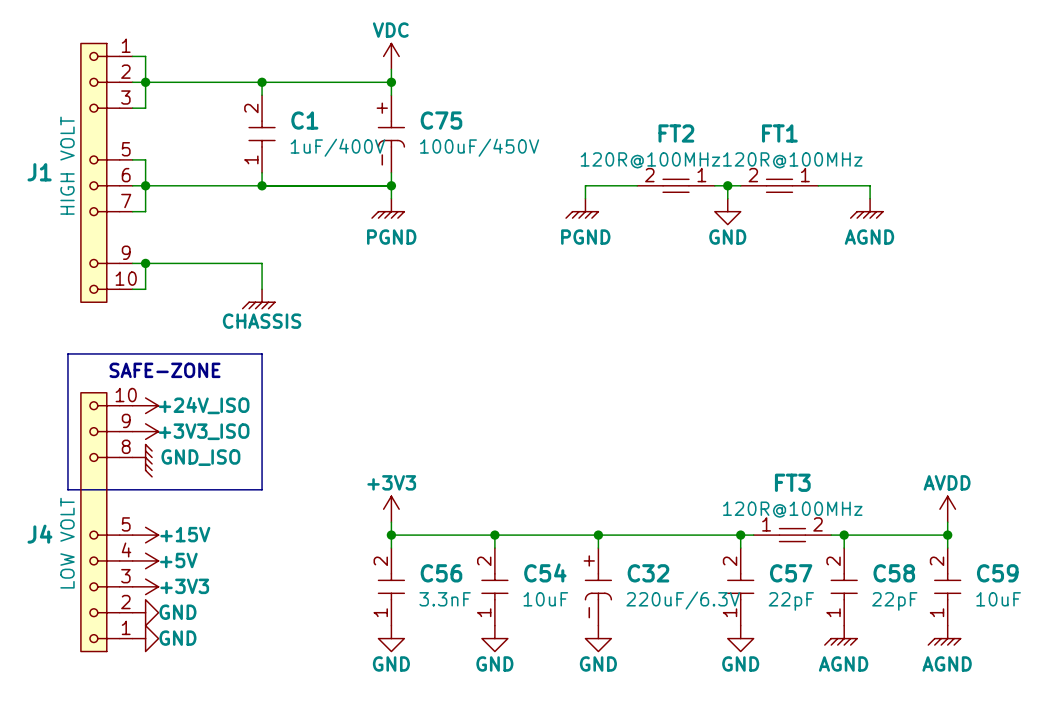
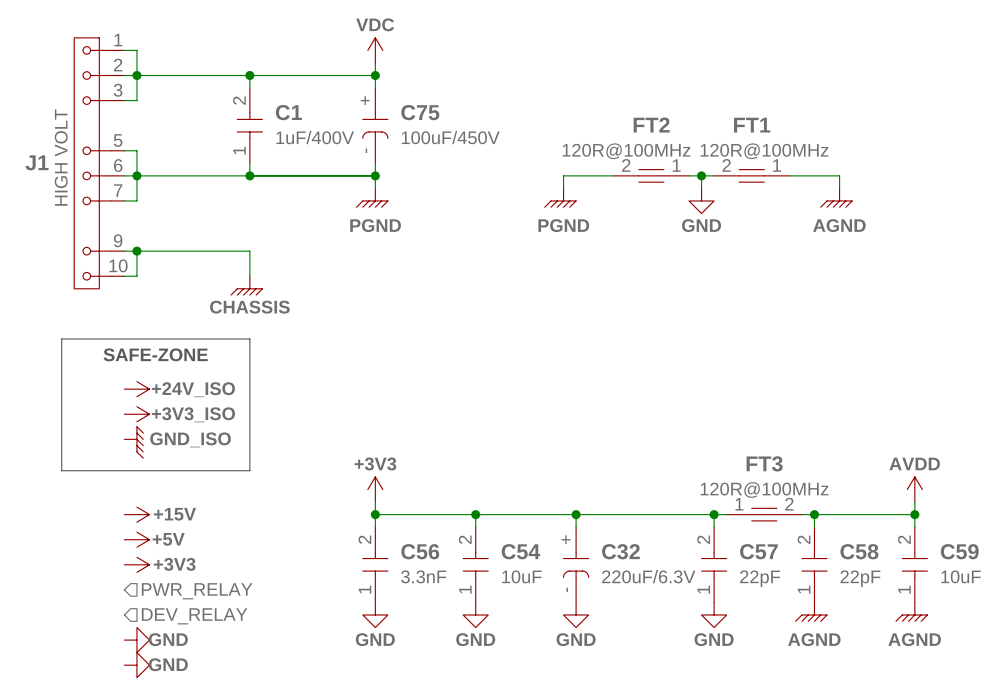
J4: LOW VOLT (106, 522) -> none
power symbol: GND (145, 612) -> none
hierarchical label: none -> PWR_RELAY (197, 591)
power symbol: GND (145, 638) -> none
hierarchical label: none -> DEV_RELAY (194, 616)
power symbol: none -> GND (136, 640)
power symbol: none -> GND (136, 665)

